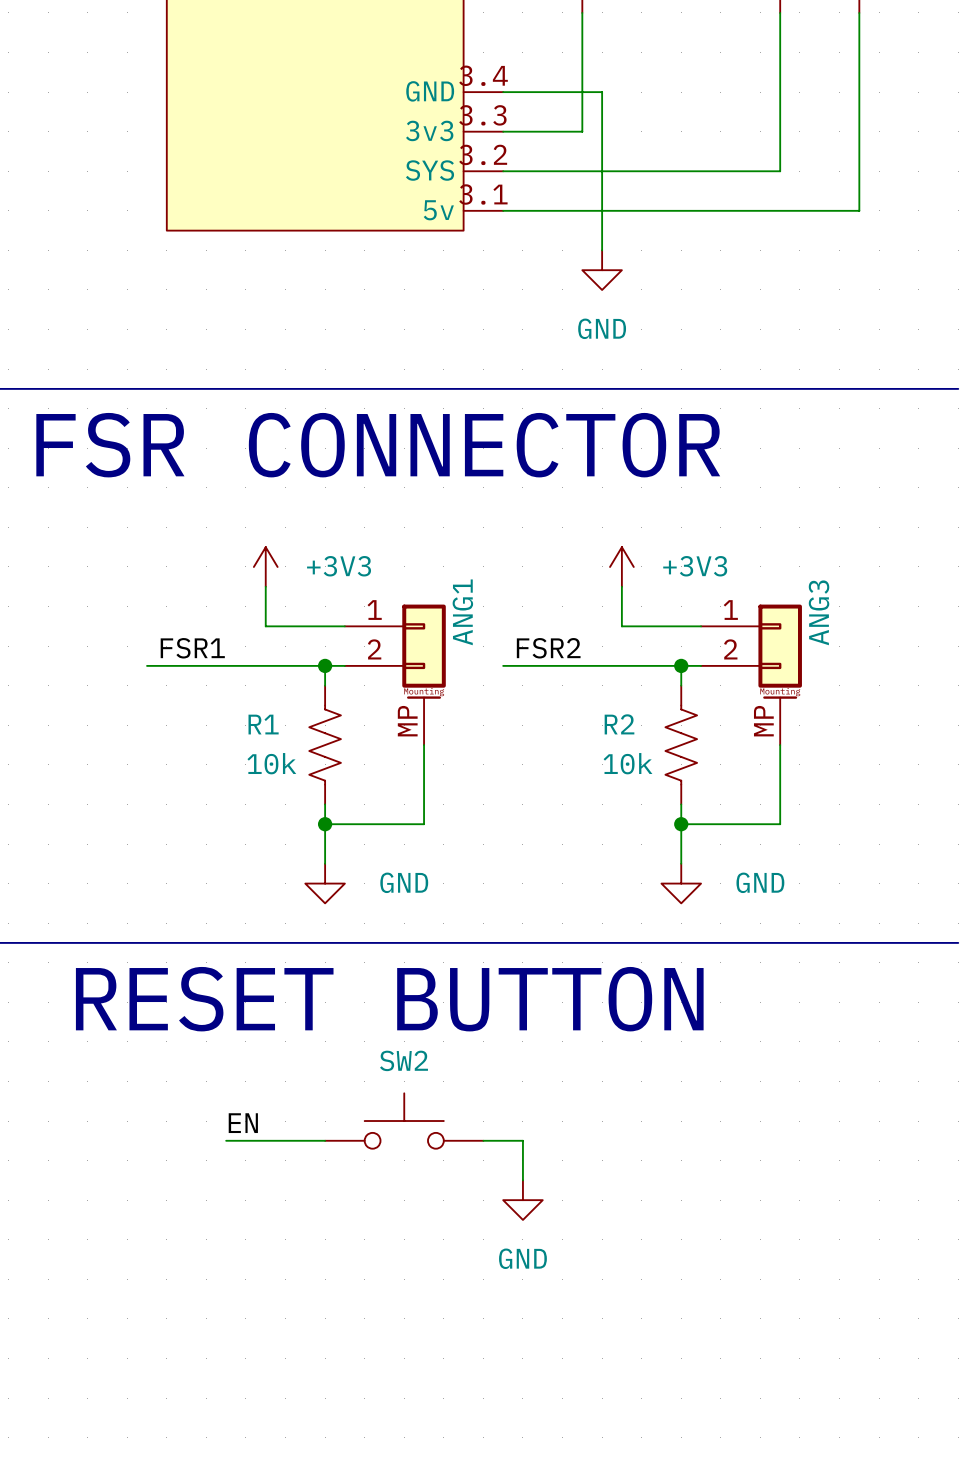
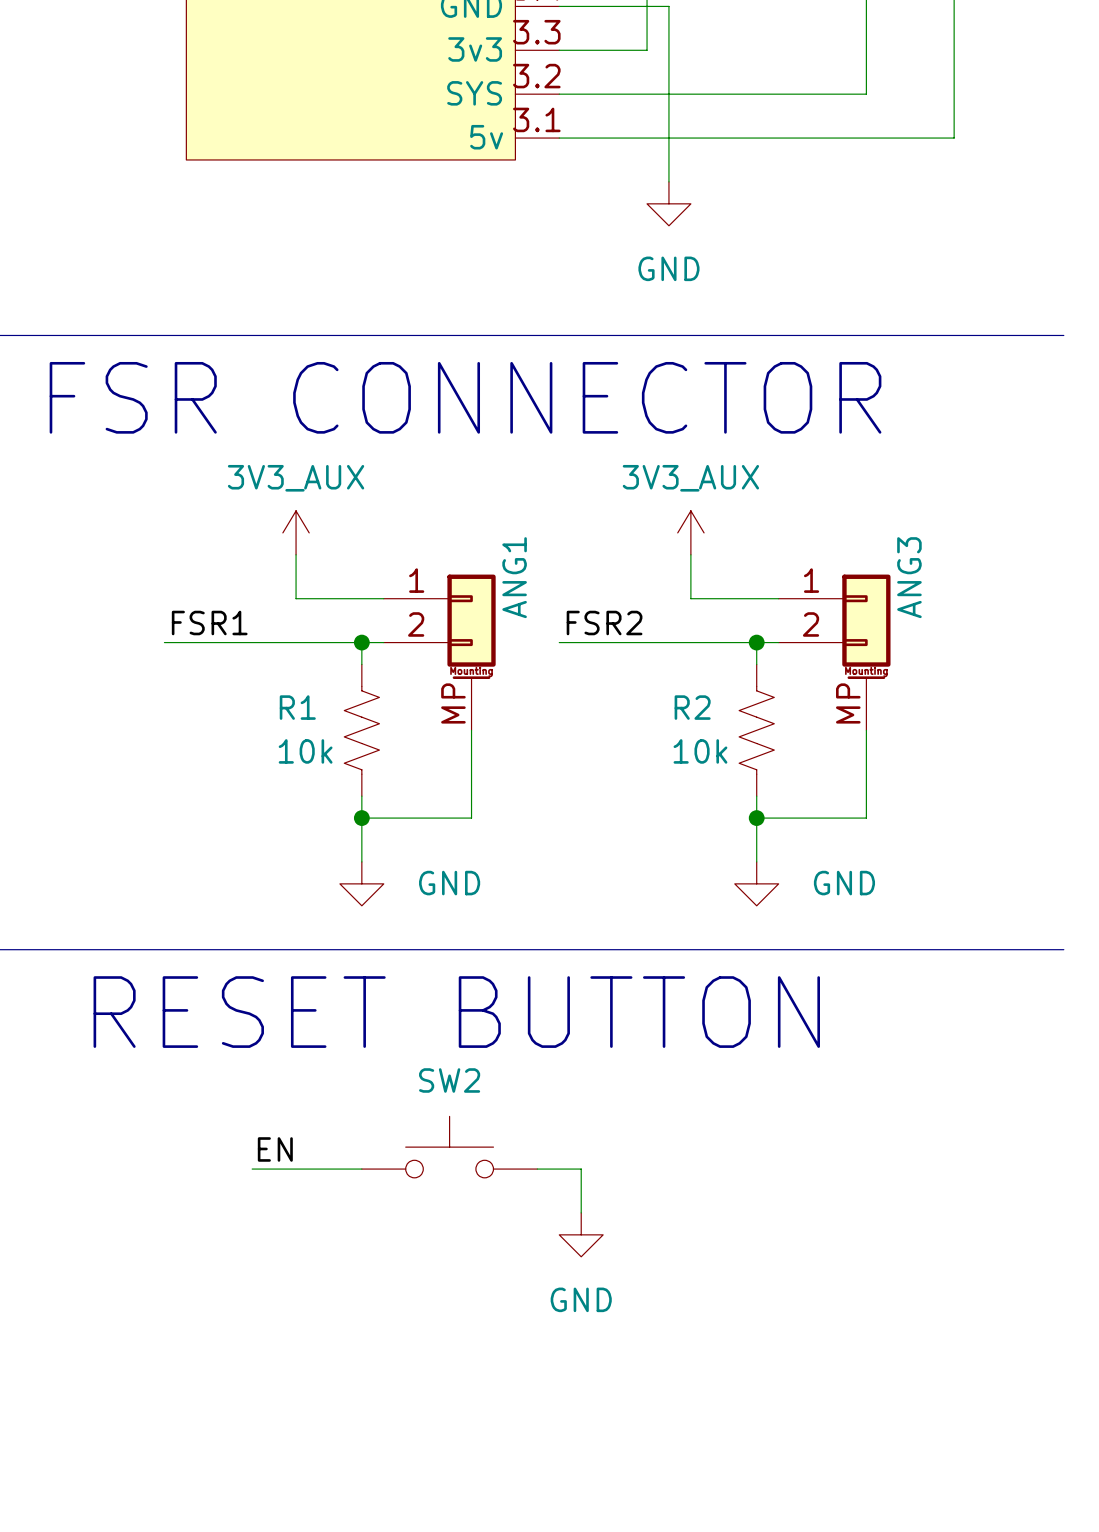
power symbol: +3V3 (265, 566) -> 3V3_AUX (296, 532)
power symbol: +3V3 (621, 566) -> 3V3_AUX (690, 532)

